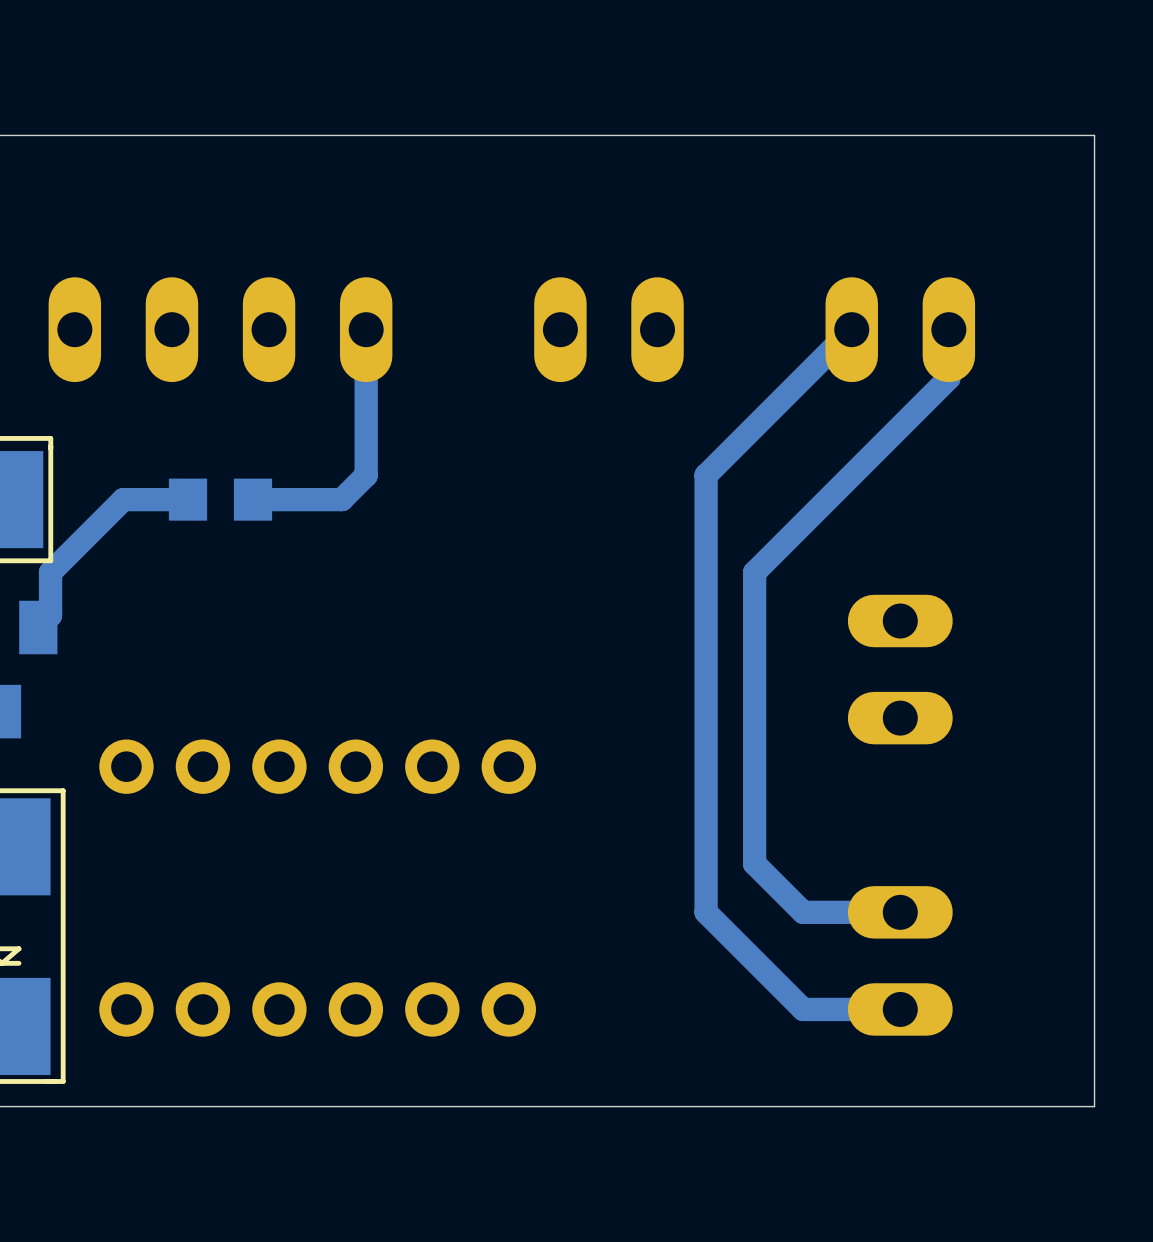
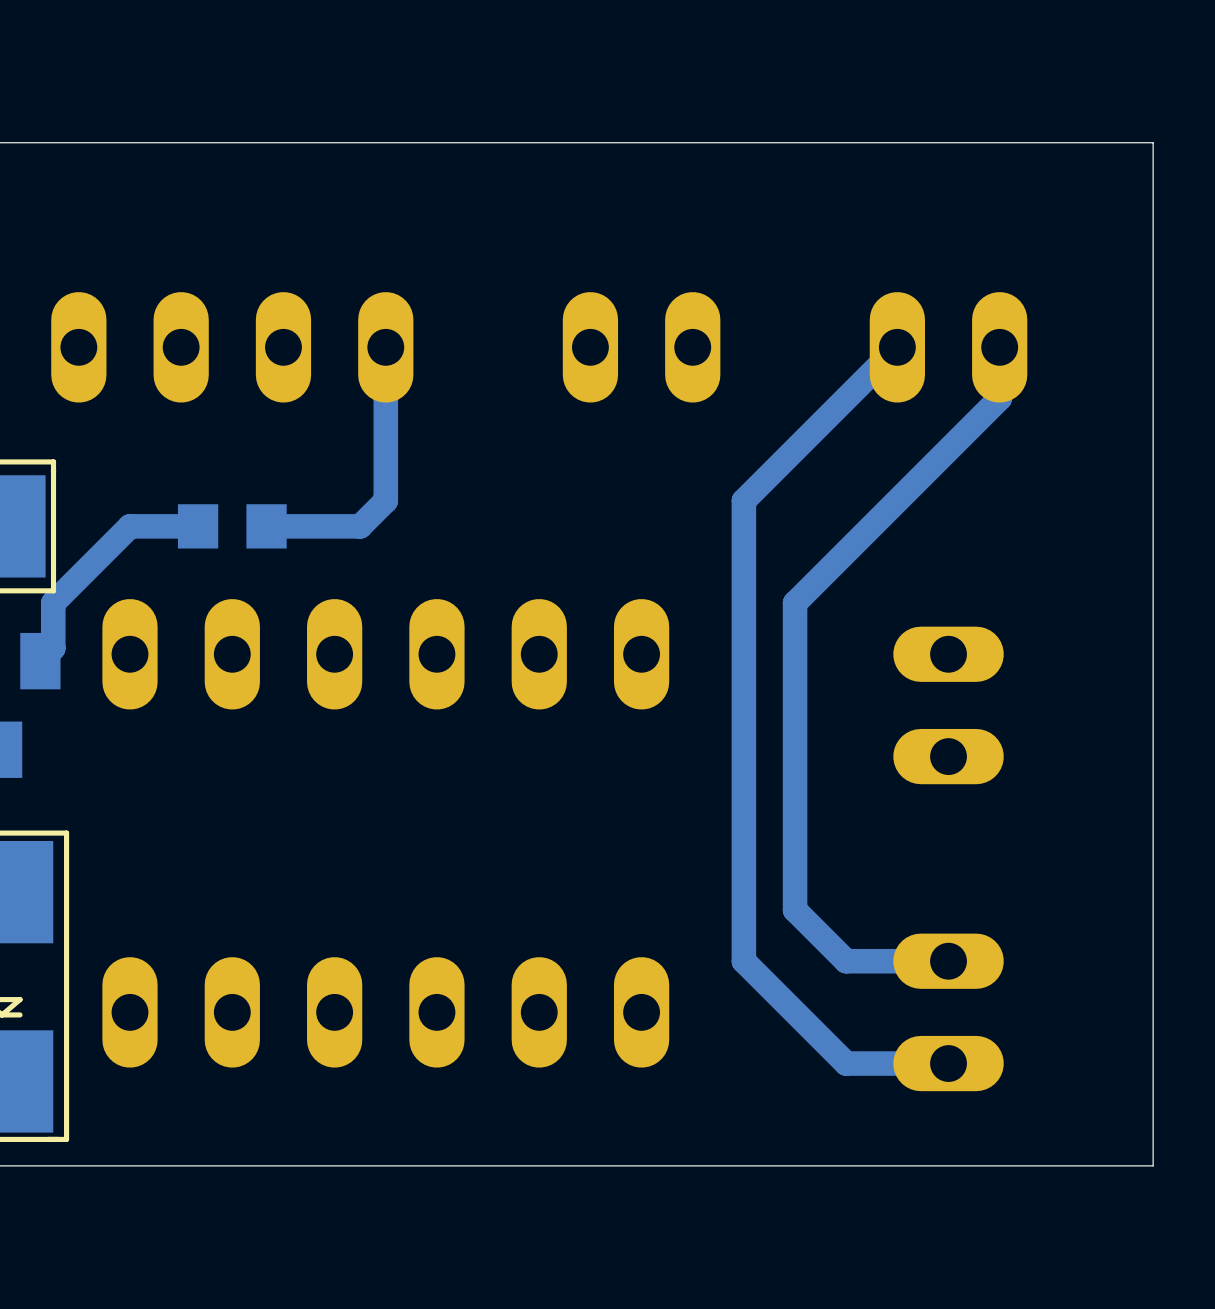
part: none -> (385, 654)
part: (317, 766) -> none
part: none -> (385, 1012)
part: (317, 1009) -> none

